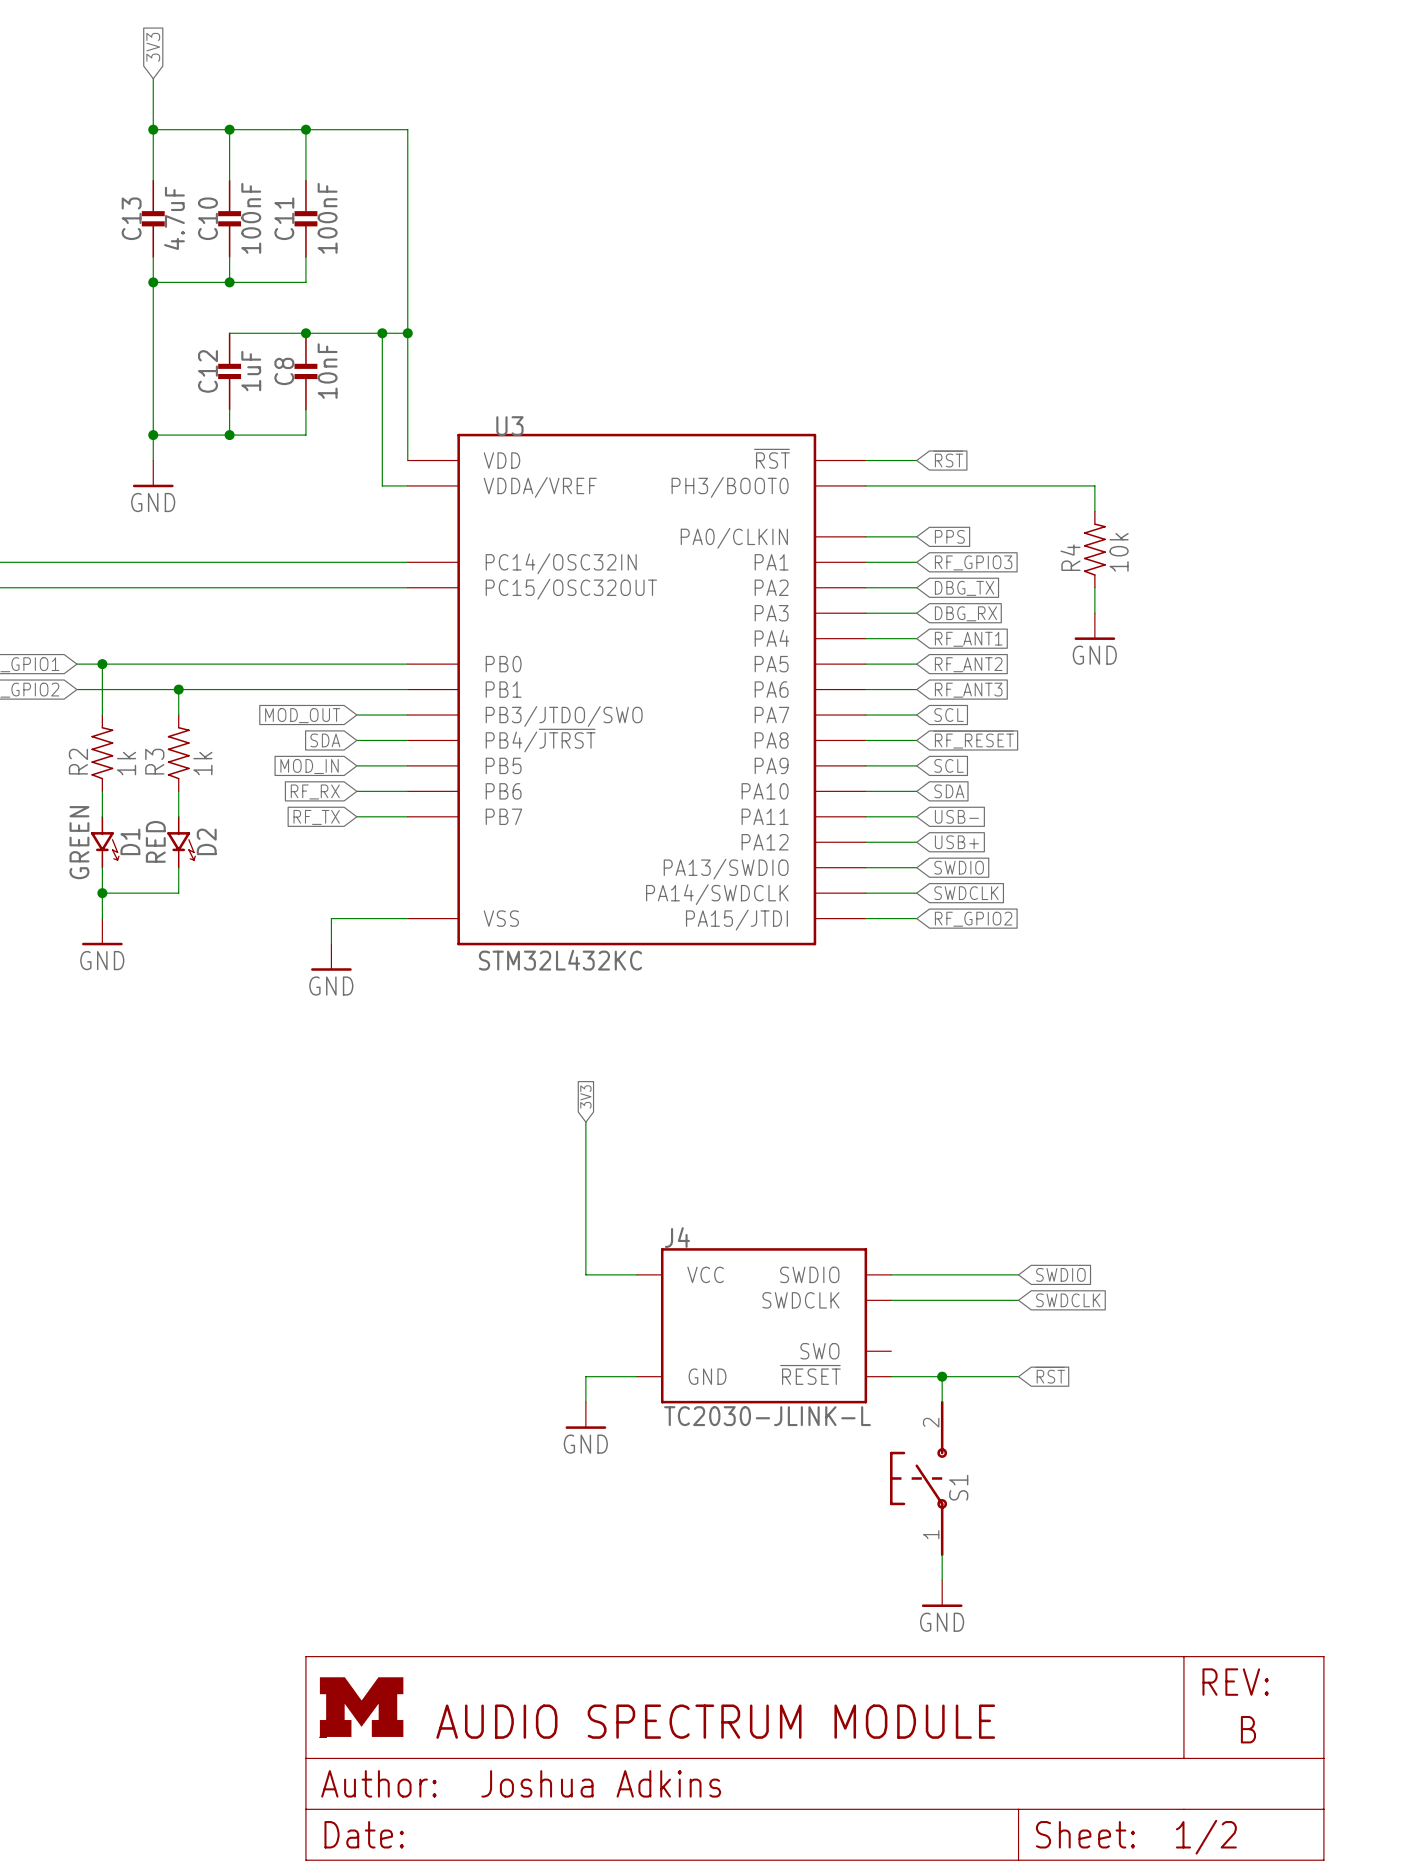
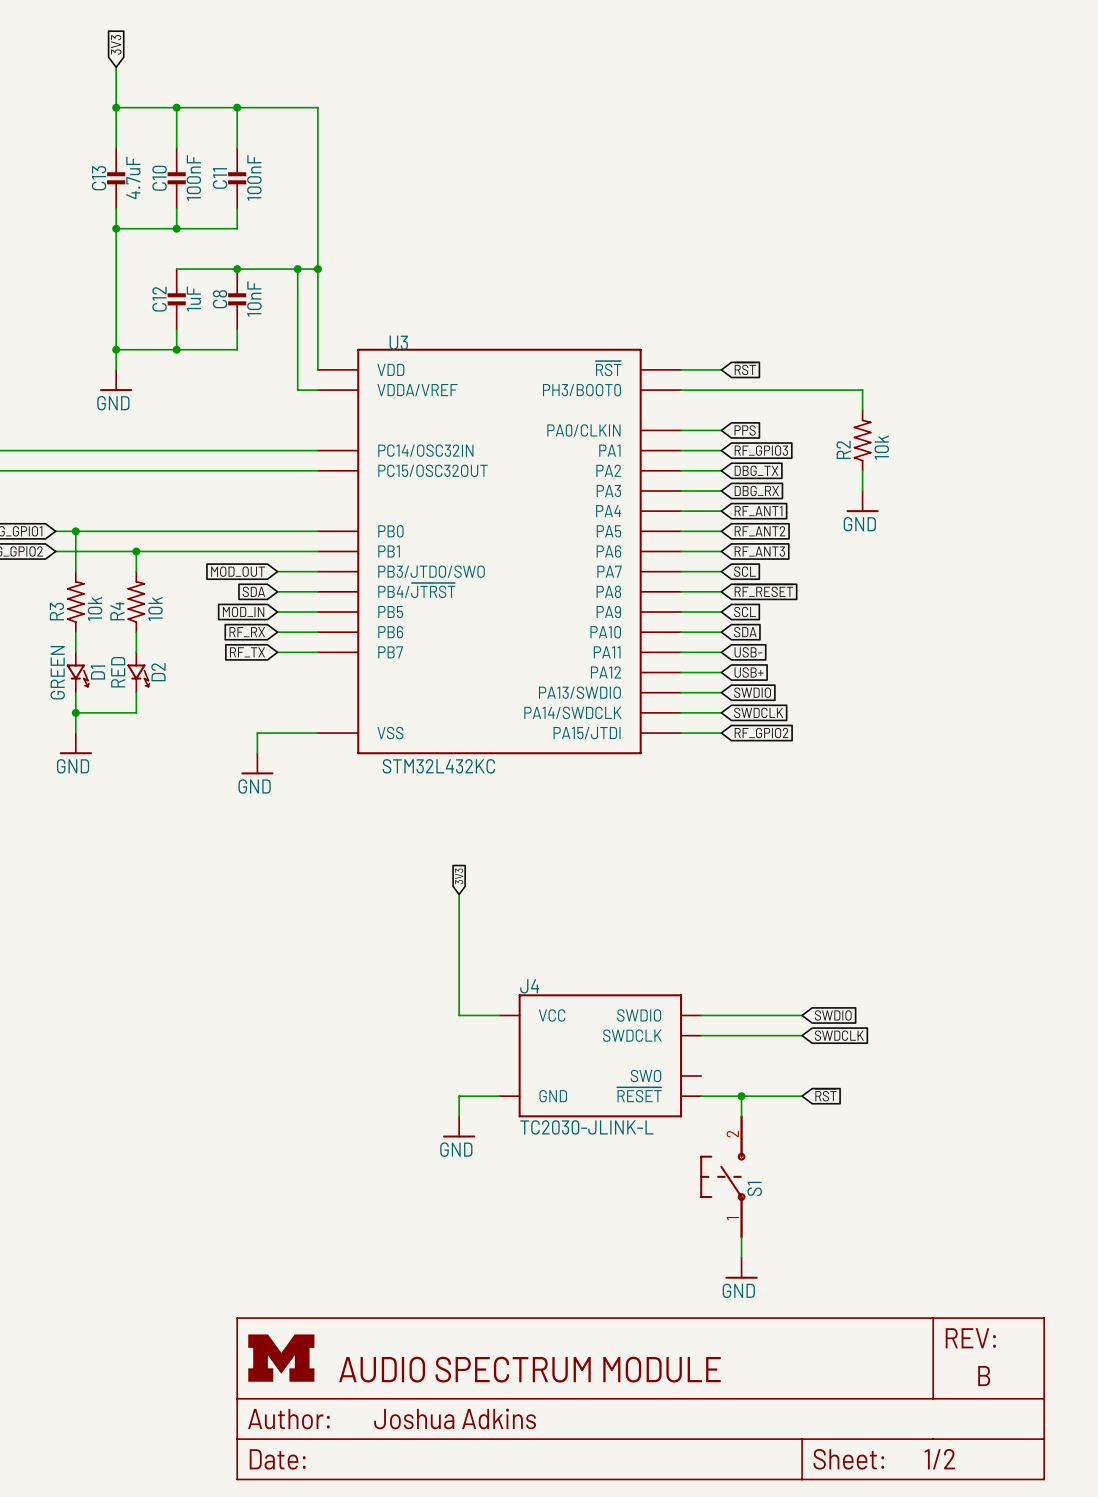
R4 name: R4 (1070, 557) -> R2 (843, 449)
R2 name: R2 (78, 761) -> R3 (56, 611)
R3 name: R3 (154, 761) -> R4 (117, 611)
R2 value: 1k (126, 763) -> 10k (94, 608)
R3 value: 1k (202, 763) -> 10k (155, 608)

